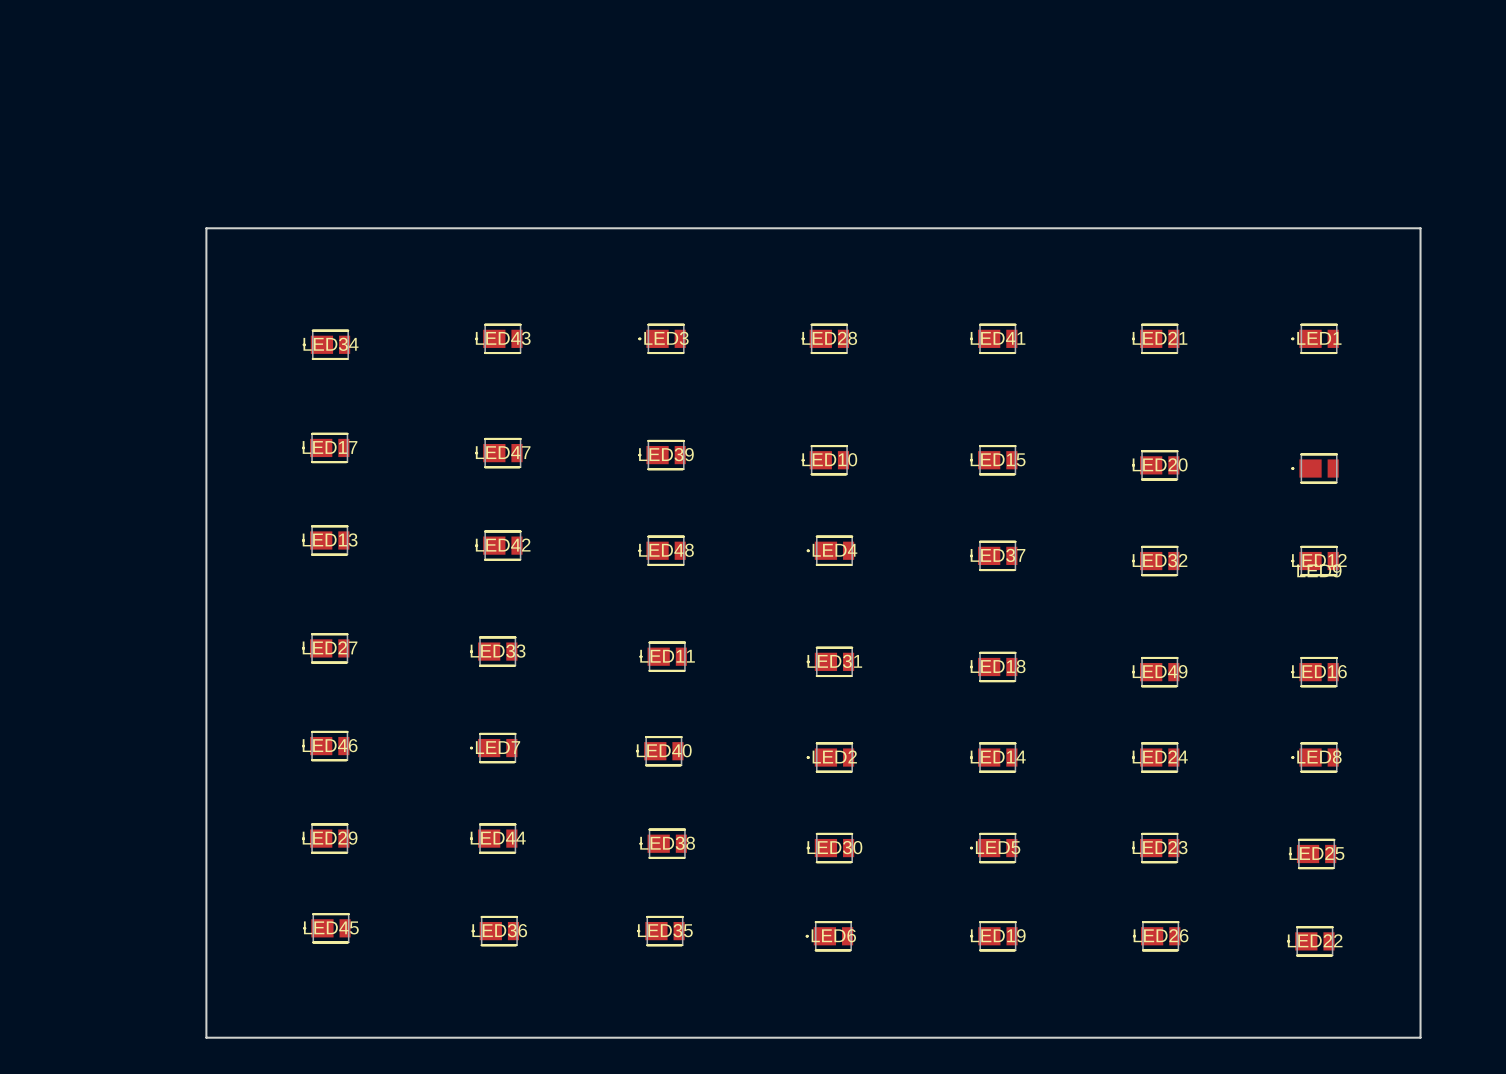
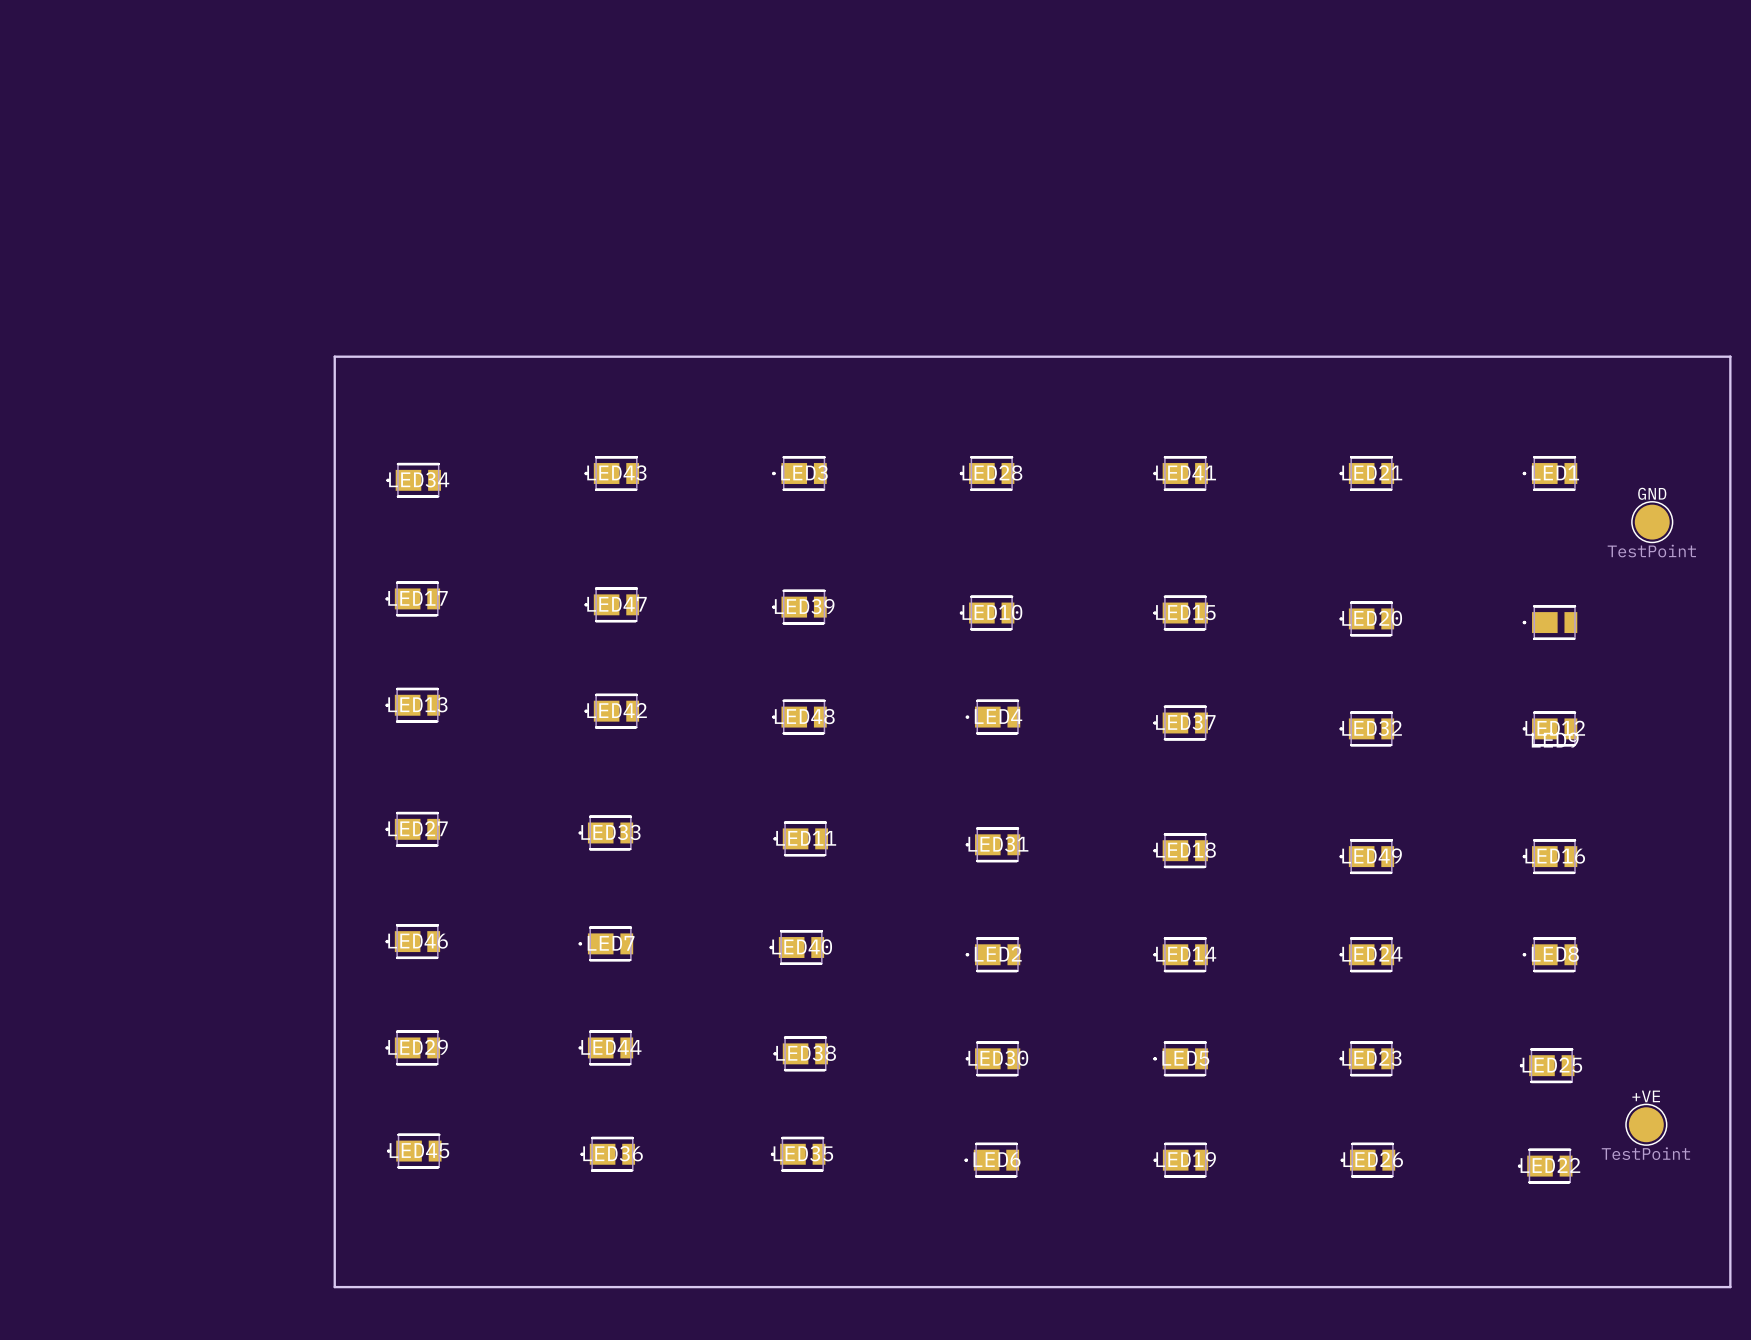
board edge: (206, 228) (1420, 228) (1420, 1037) (206, 1037) (206, 228) -> (334, 356) (334, 1287) (1730, 1287) (1730, 356) (334, 356)
GND: none -> TestPoint (1652, 522)
+VE: none -> TestPoint (1646, 1124)

